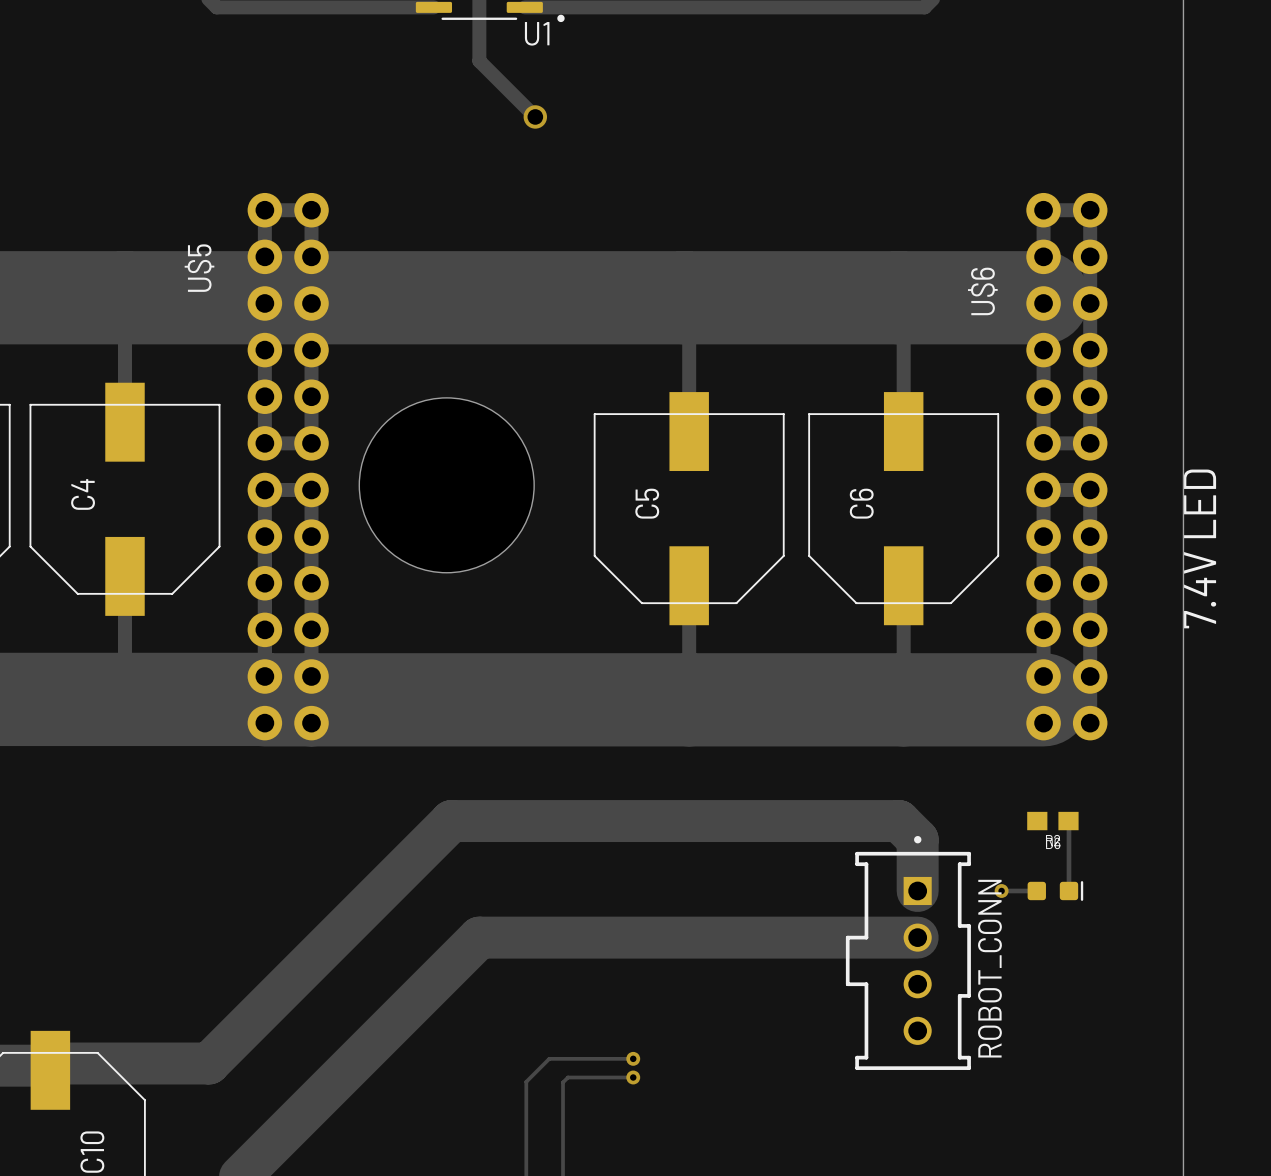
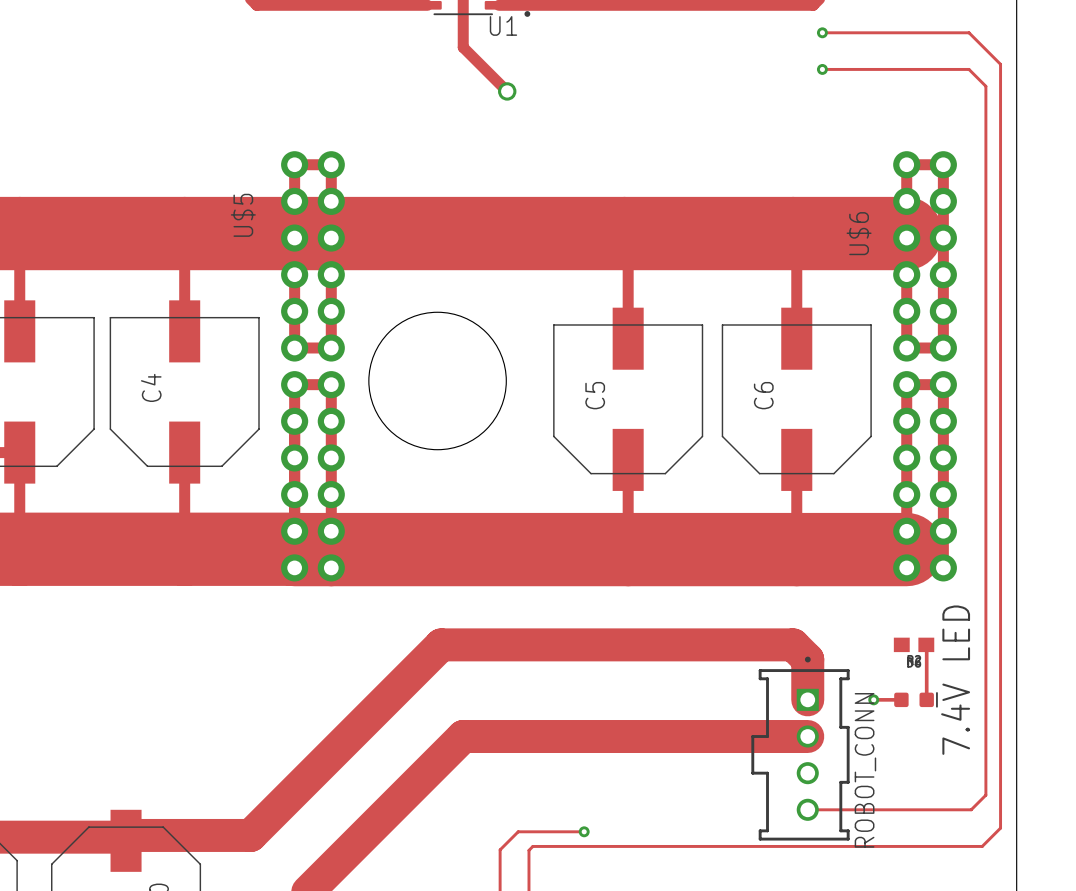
track: none -> (822, 32) (969, 32) (1000, 64) (1000, 828) (982, 846) (584, 846)
via: none -> (822, 32)
track: none -> (822, 69) (969, 69) (985, 86) (985, 795) (971, 809) (807, 809)
via: none -> (822, 69)
text position: 7.4V LED (1199, 548) -> 7.4V LED (955, 680)
via: (633, 1077) -> none

